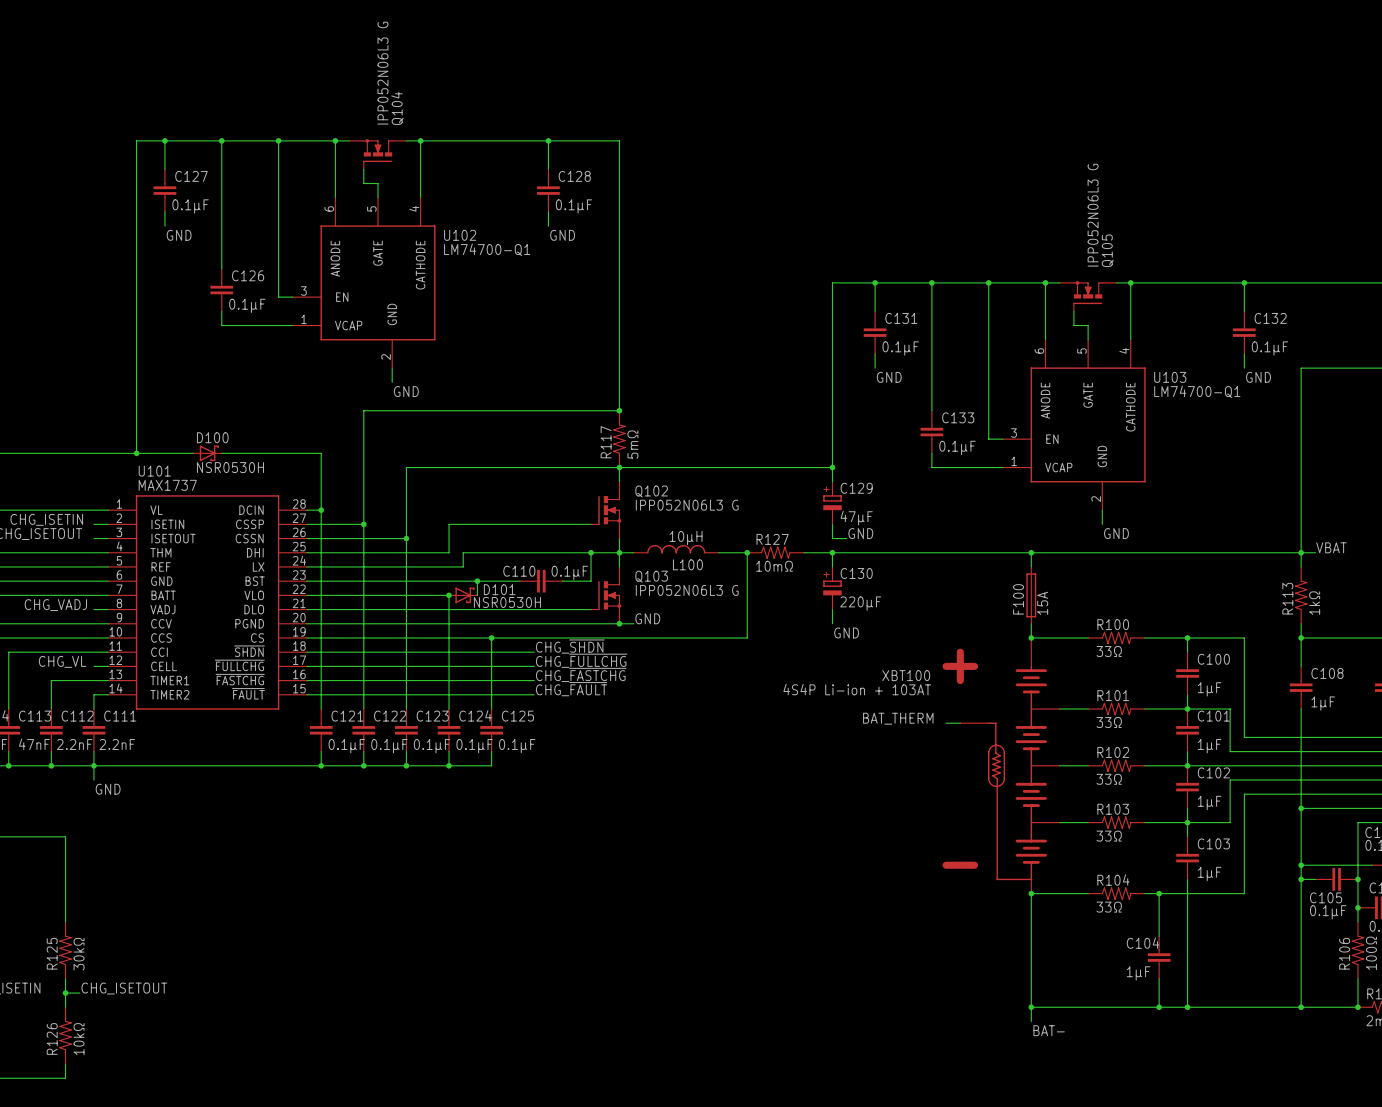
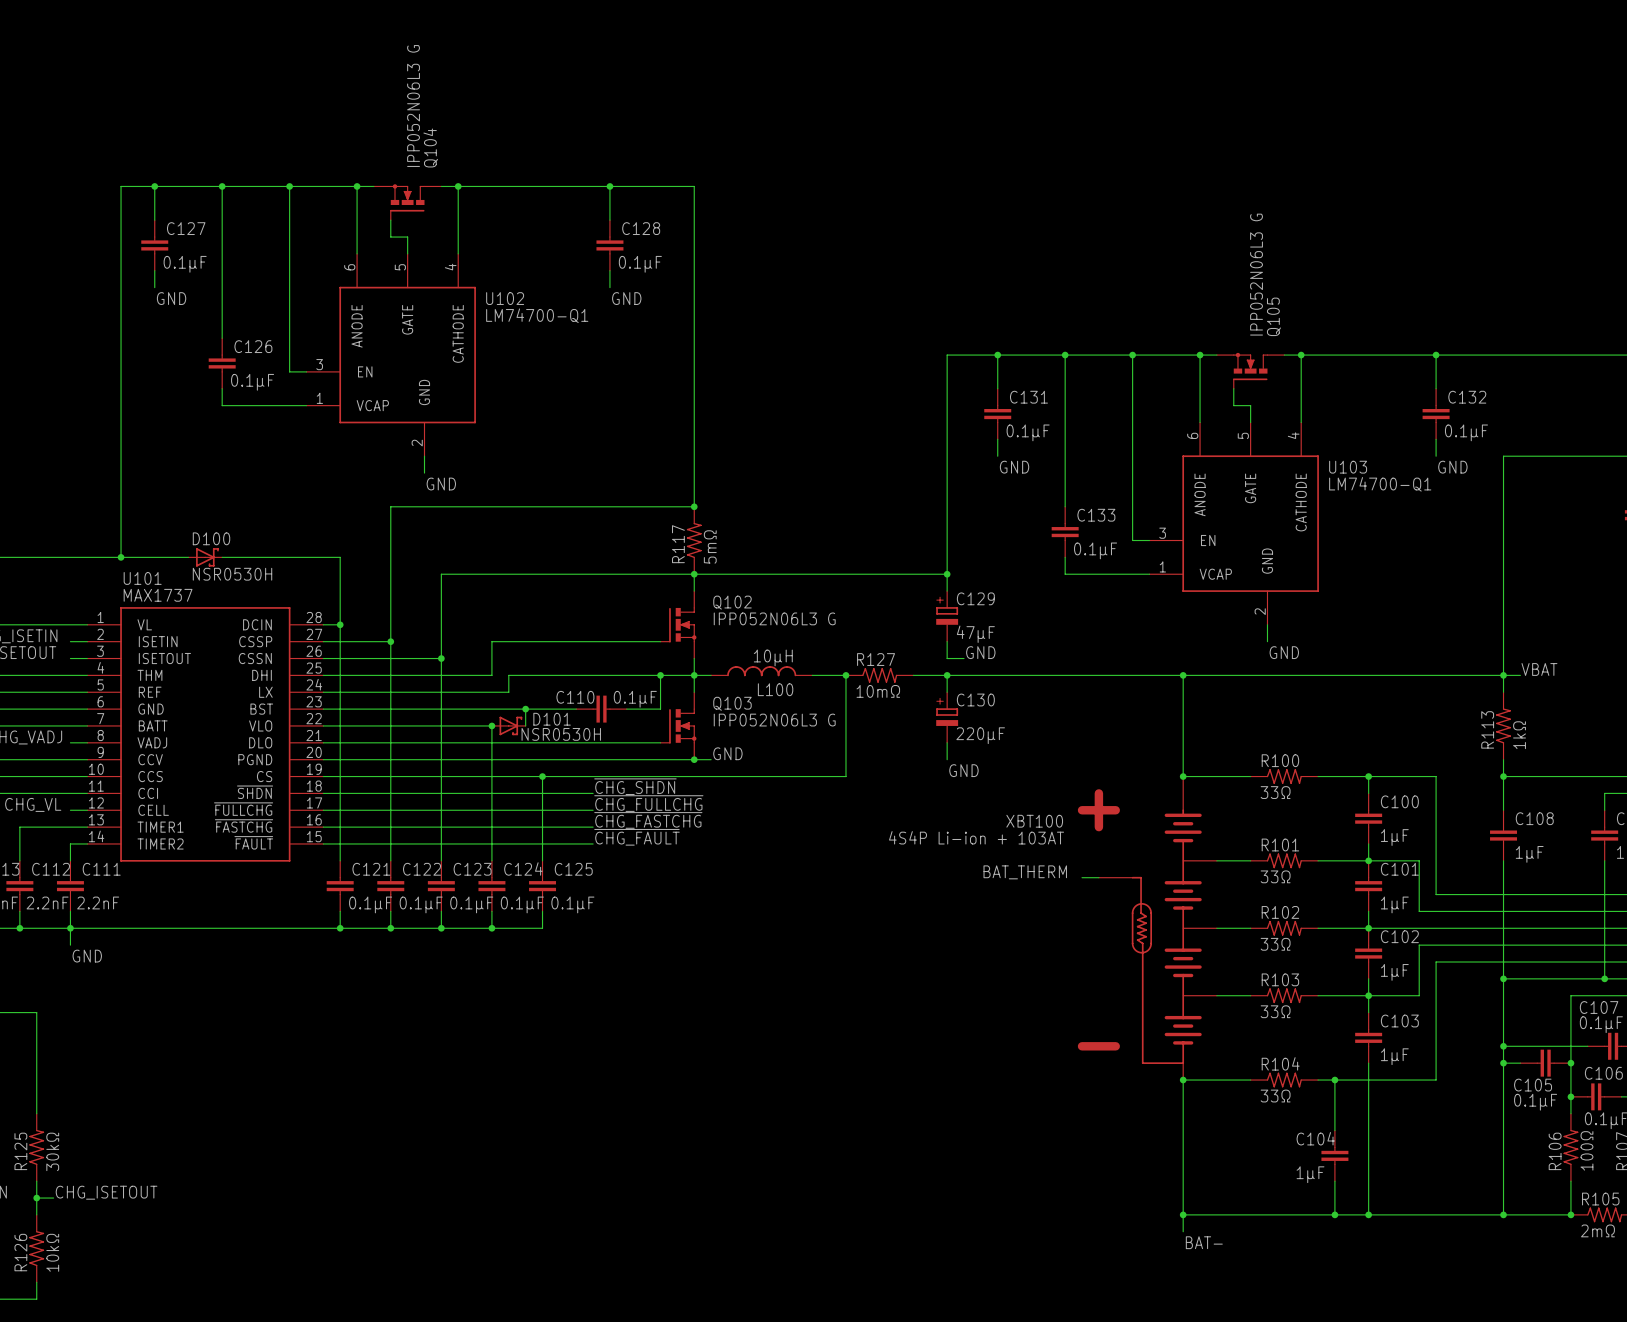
F100: 15A (1031, 595) -> none
label: CHG_~{SHDN} (570, 646) -> ~{CHG_SHDN} (635, 786)
label: CHG_~{FULLCHG} (581, 660) -> ~{CHG_FULLCHG} (648, 803)
label: CHG_~{FASTCHG} (581, 674) -> ~{CHG_FASTCHG} (648, 820)
label: CHG_~{FAULT} (571, 689) -> ~{CHG_FAULT} (636, 837)

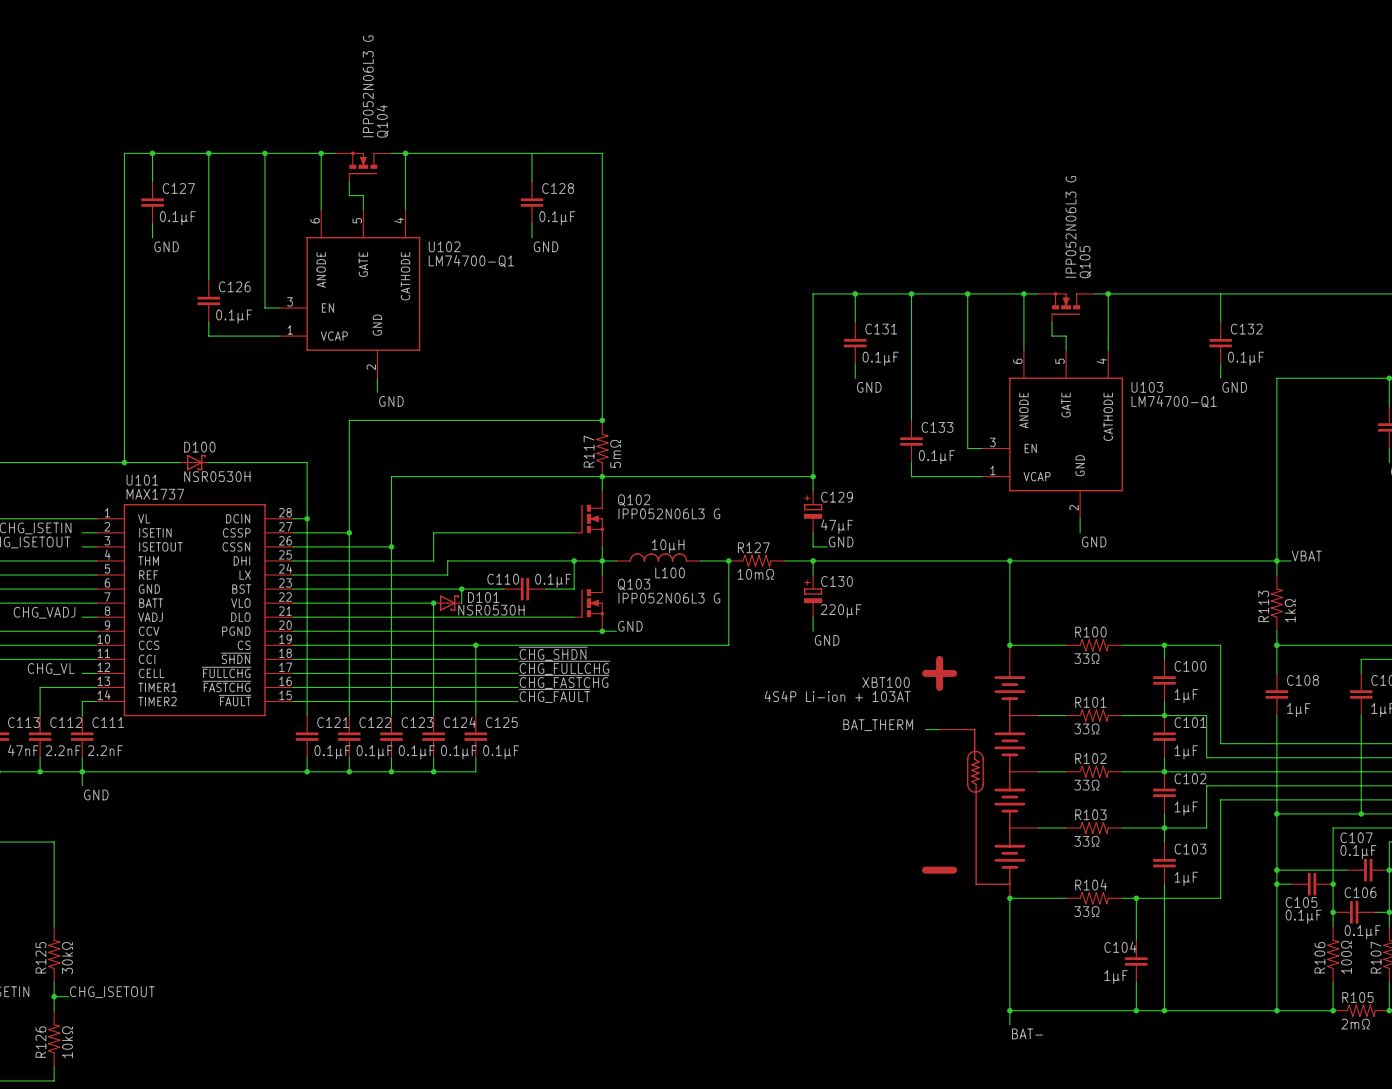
junction: (609, 186) -> none
junction: (1436, 355) -> none

